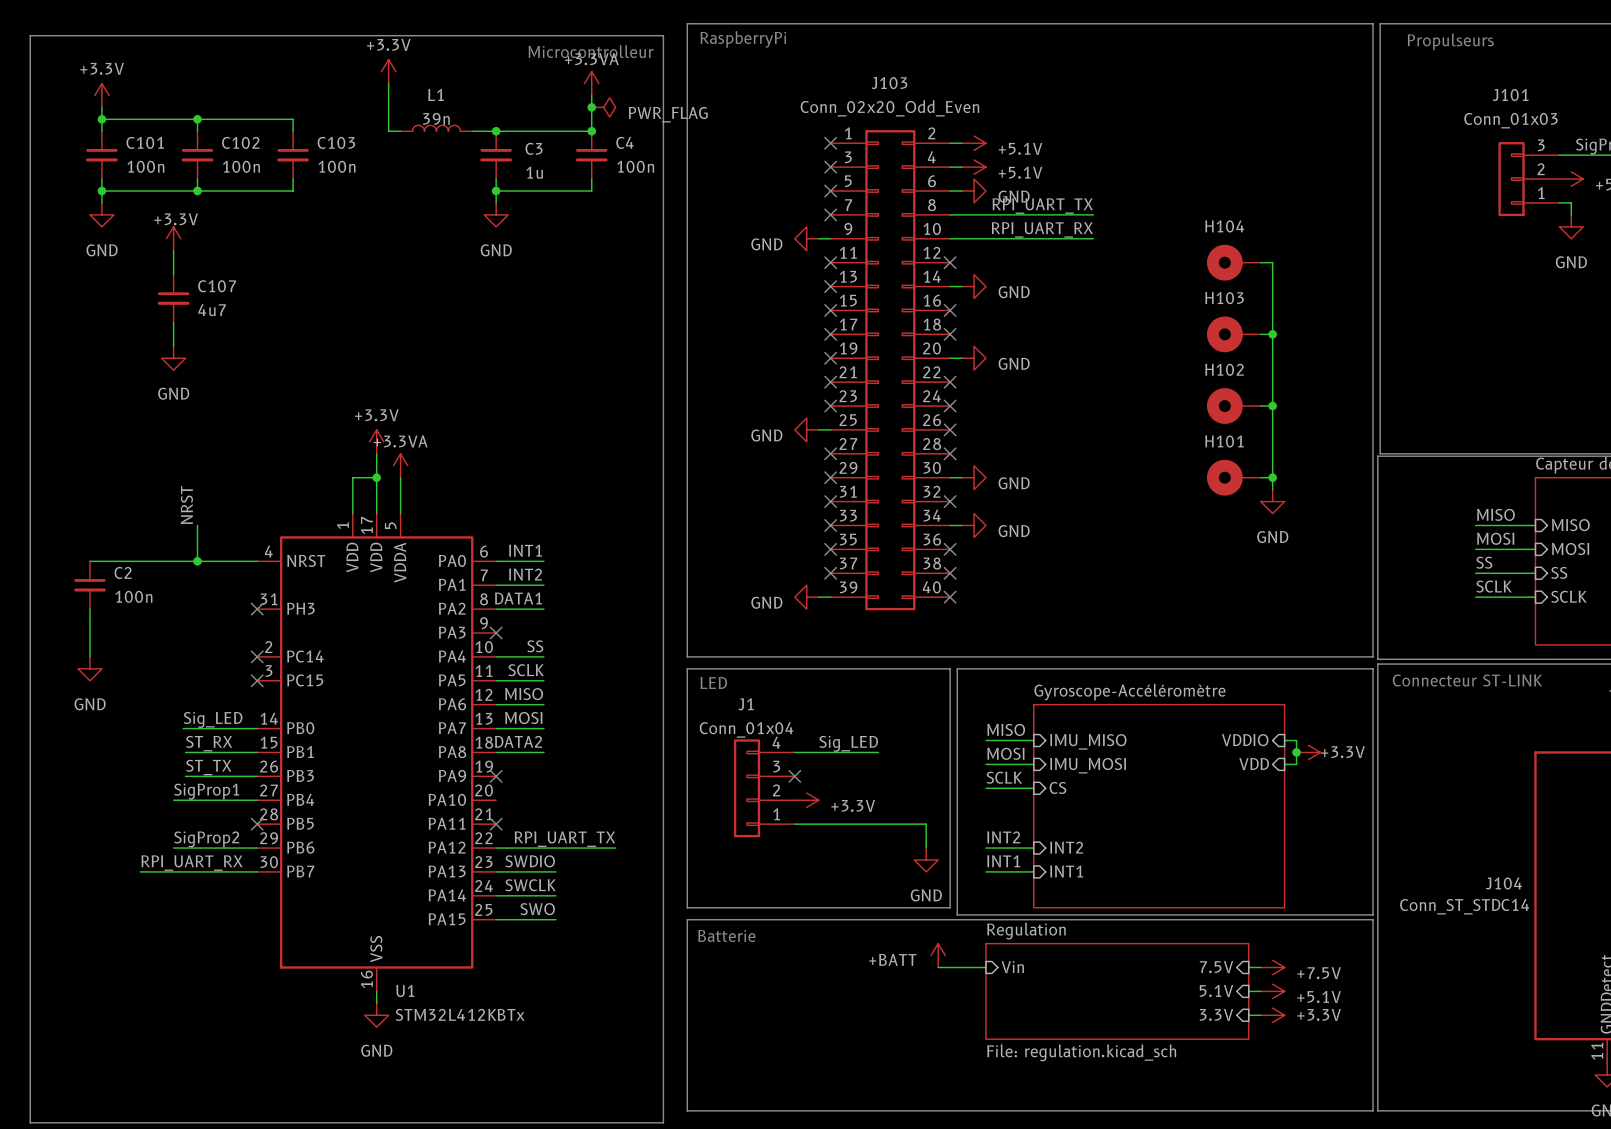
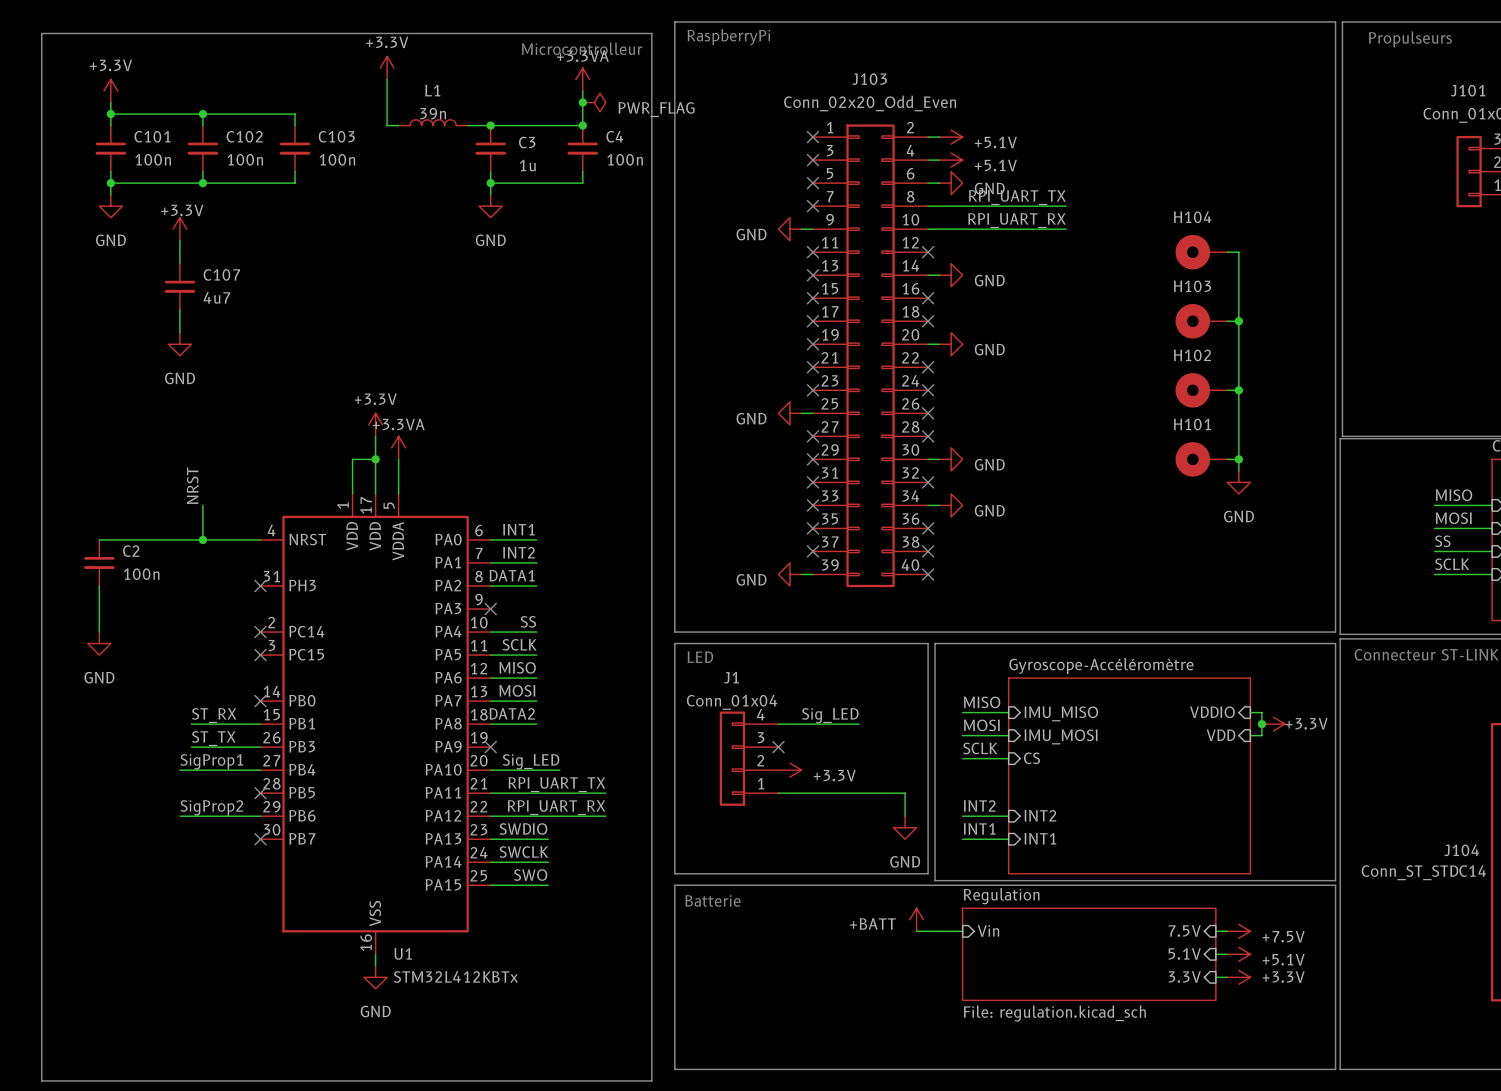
label: Sig_LED (213, 719) -> none
wire: (183, 728) (257, 728) -> none
no-connect mark: none -> (260, 701)
label: none -> Sig_LED (531, 761)
wire: none -> (490, 770) (559, 770)
label: none -> RPI_UART_TX (556, 784)
wire: none -> (490, 793) (605, 793)
no-connect mark: (496, 824) -> none
label: RPI_UART_TX (564, 839) -> RPI_UART_RX (556, 807)
label: RPI_UART_RX (191, 863) -> none
wire: (140, 871) (257, 871) -> none
no-connect mark: none -> (260, 839)

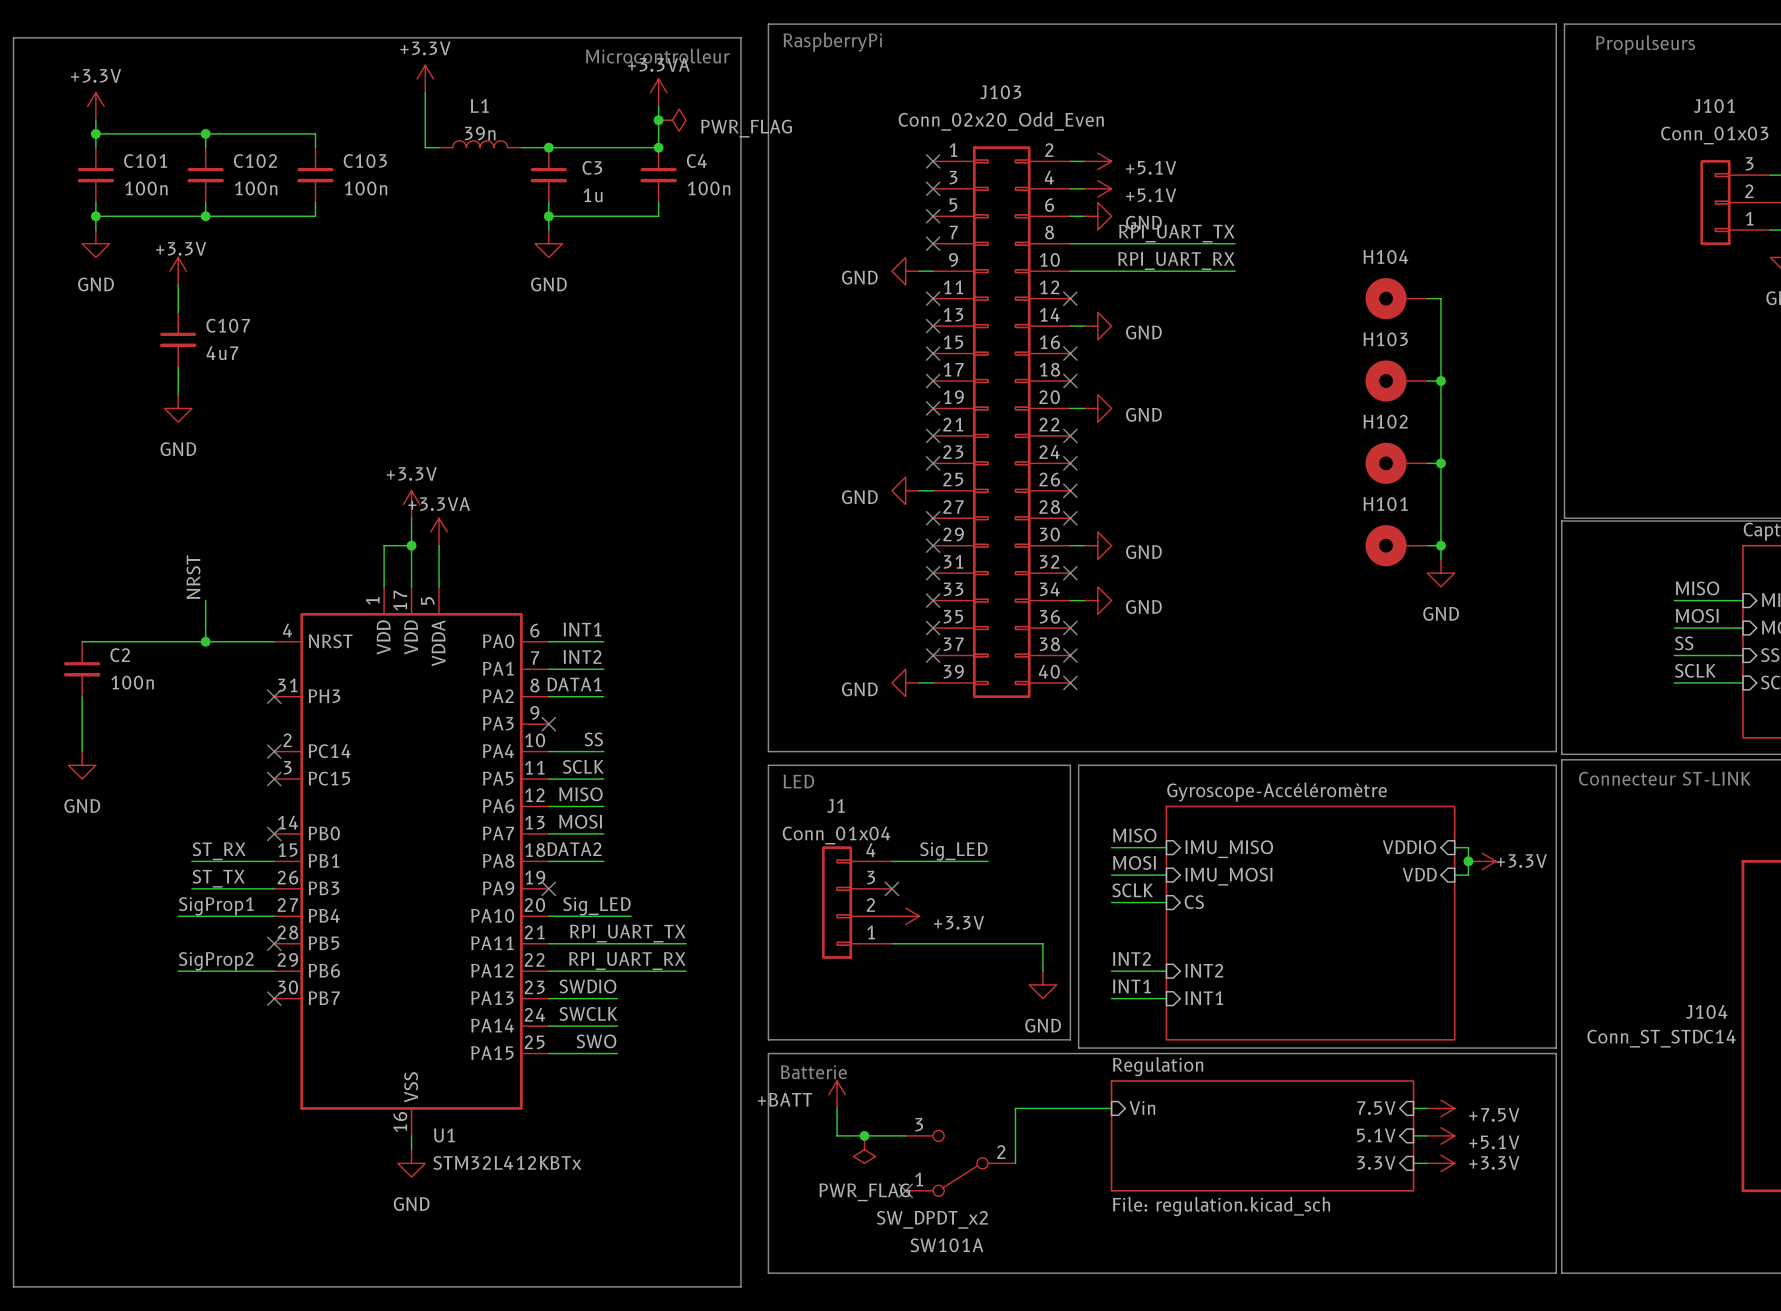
power symbol position: +BATT (916, 919) -> +BATT (837, 1094)
wire: none -> (837, 1108) (837, 1135) (905, 1135)
wire: none -> (1056, 1108) (1015, 1108) (1015, 1163)
junction: none -> (864, 1135)
power symbol: none -> PWR_FLAG (864, 1149)
SW101A: none -> SW_DPDT_x2 (960, 1163)
no-connect mark: none -> (905, 1190)

